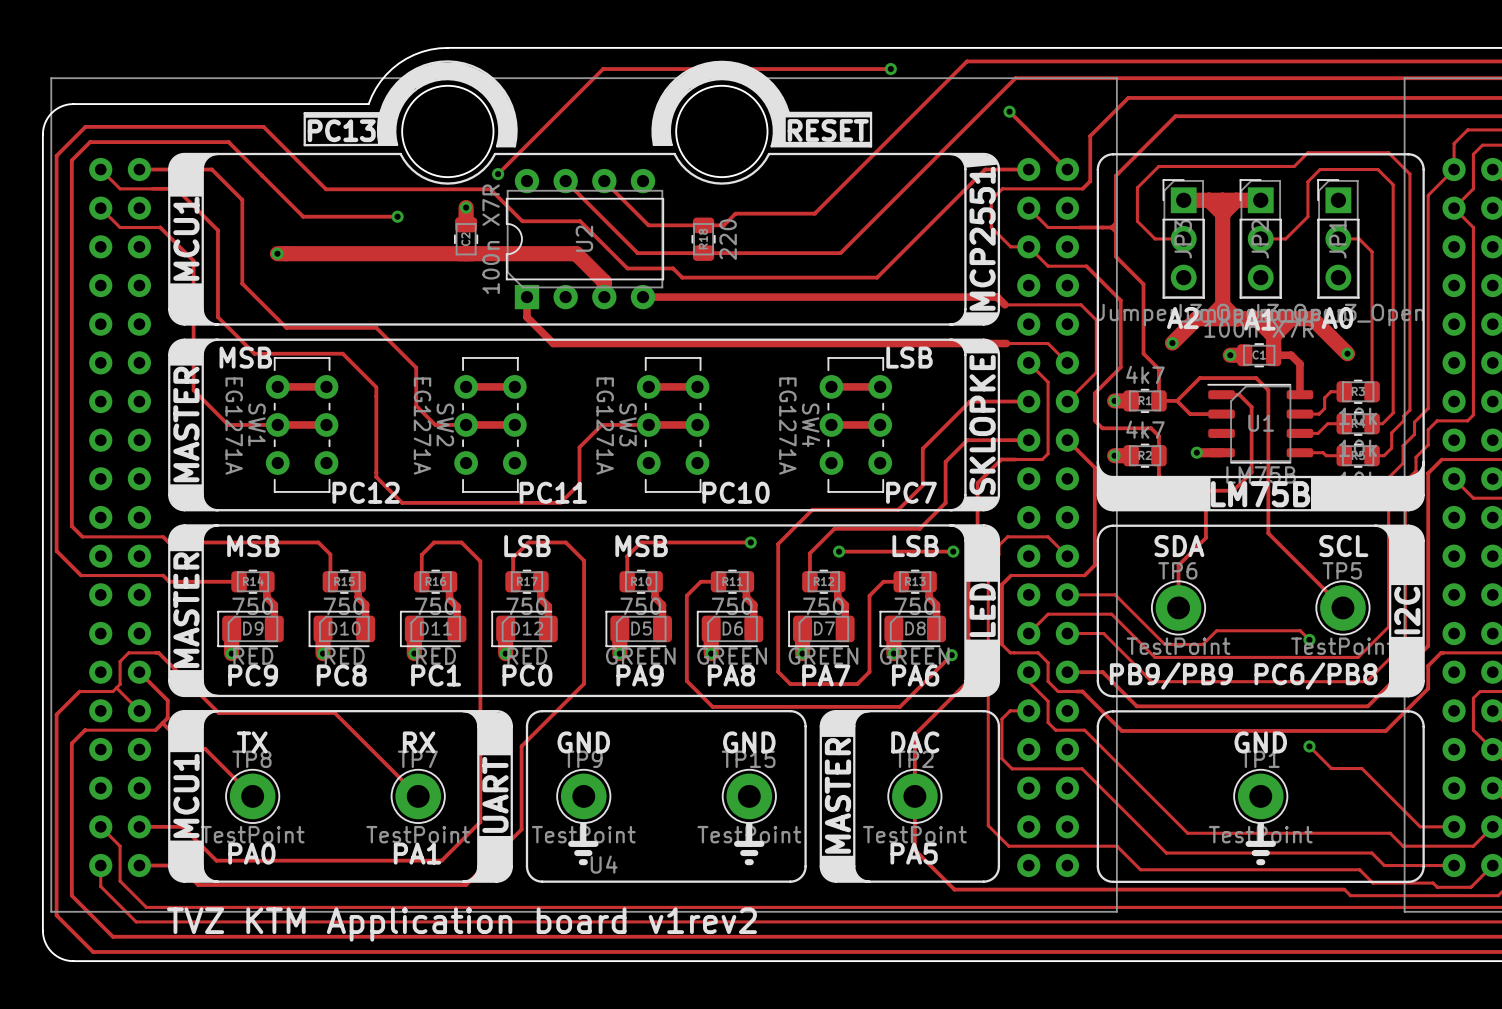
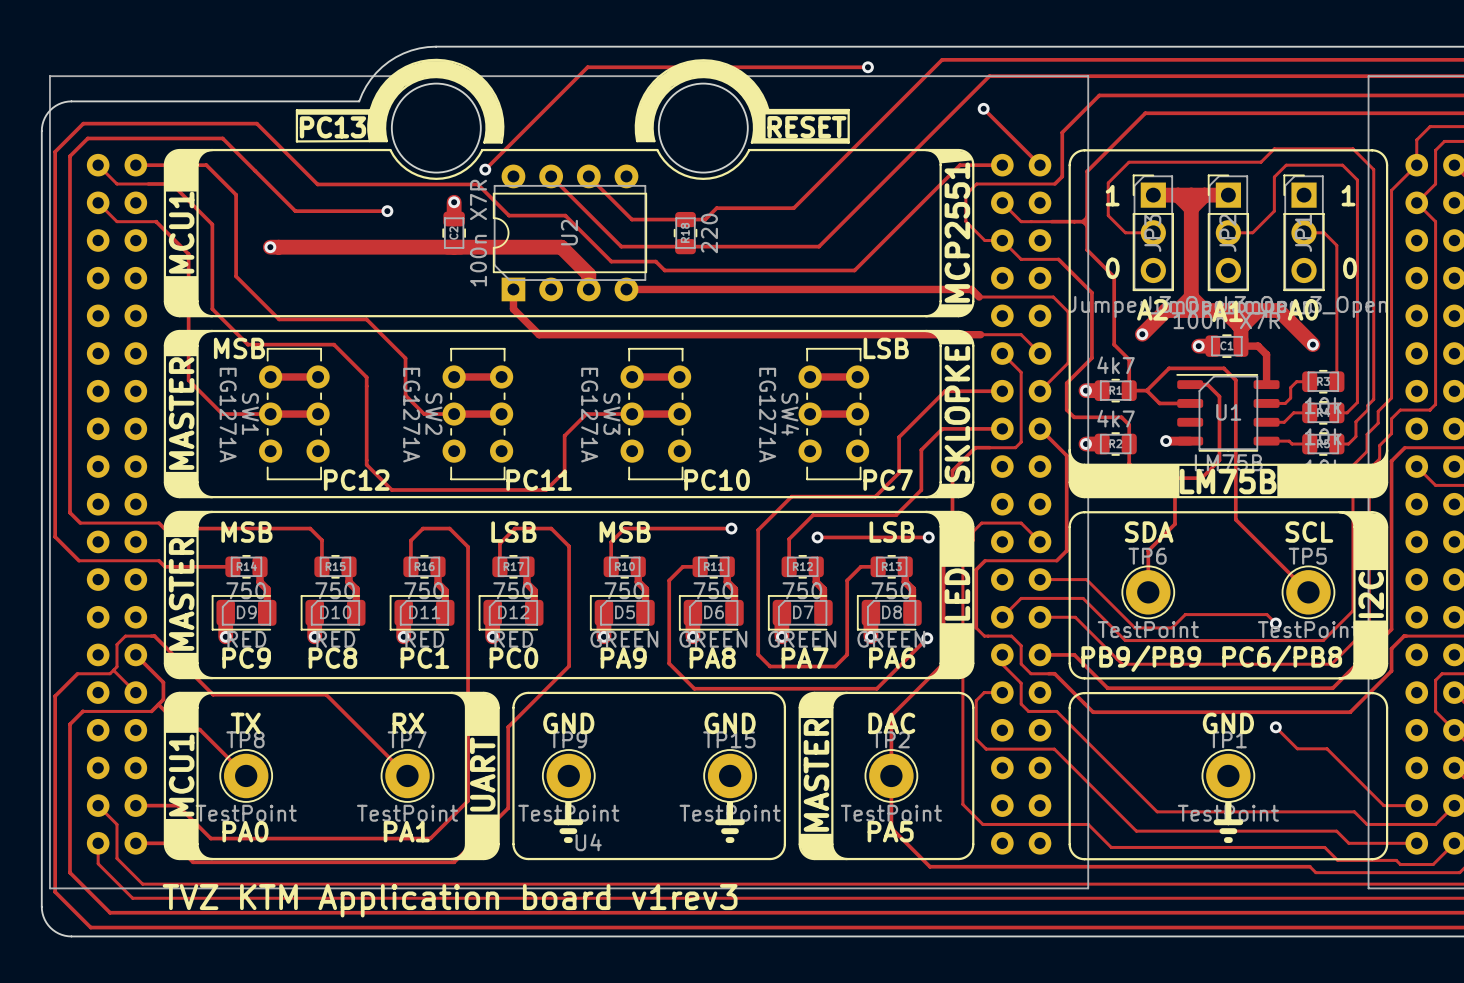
text: none -> 1 (1112, 195)
text: none -> 1 (1348, 195)
text: none -> 0 (1112, 268)
text: none -> 0 (1350, 268)
text: TVZ KTM Application board v1rev2 (461, 924) -> TVZ KTM Application board v1rev3 (450, 900)

